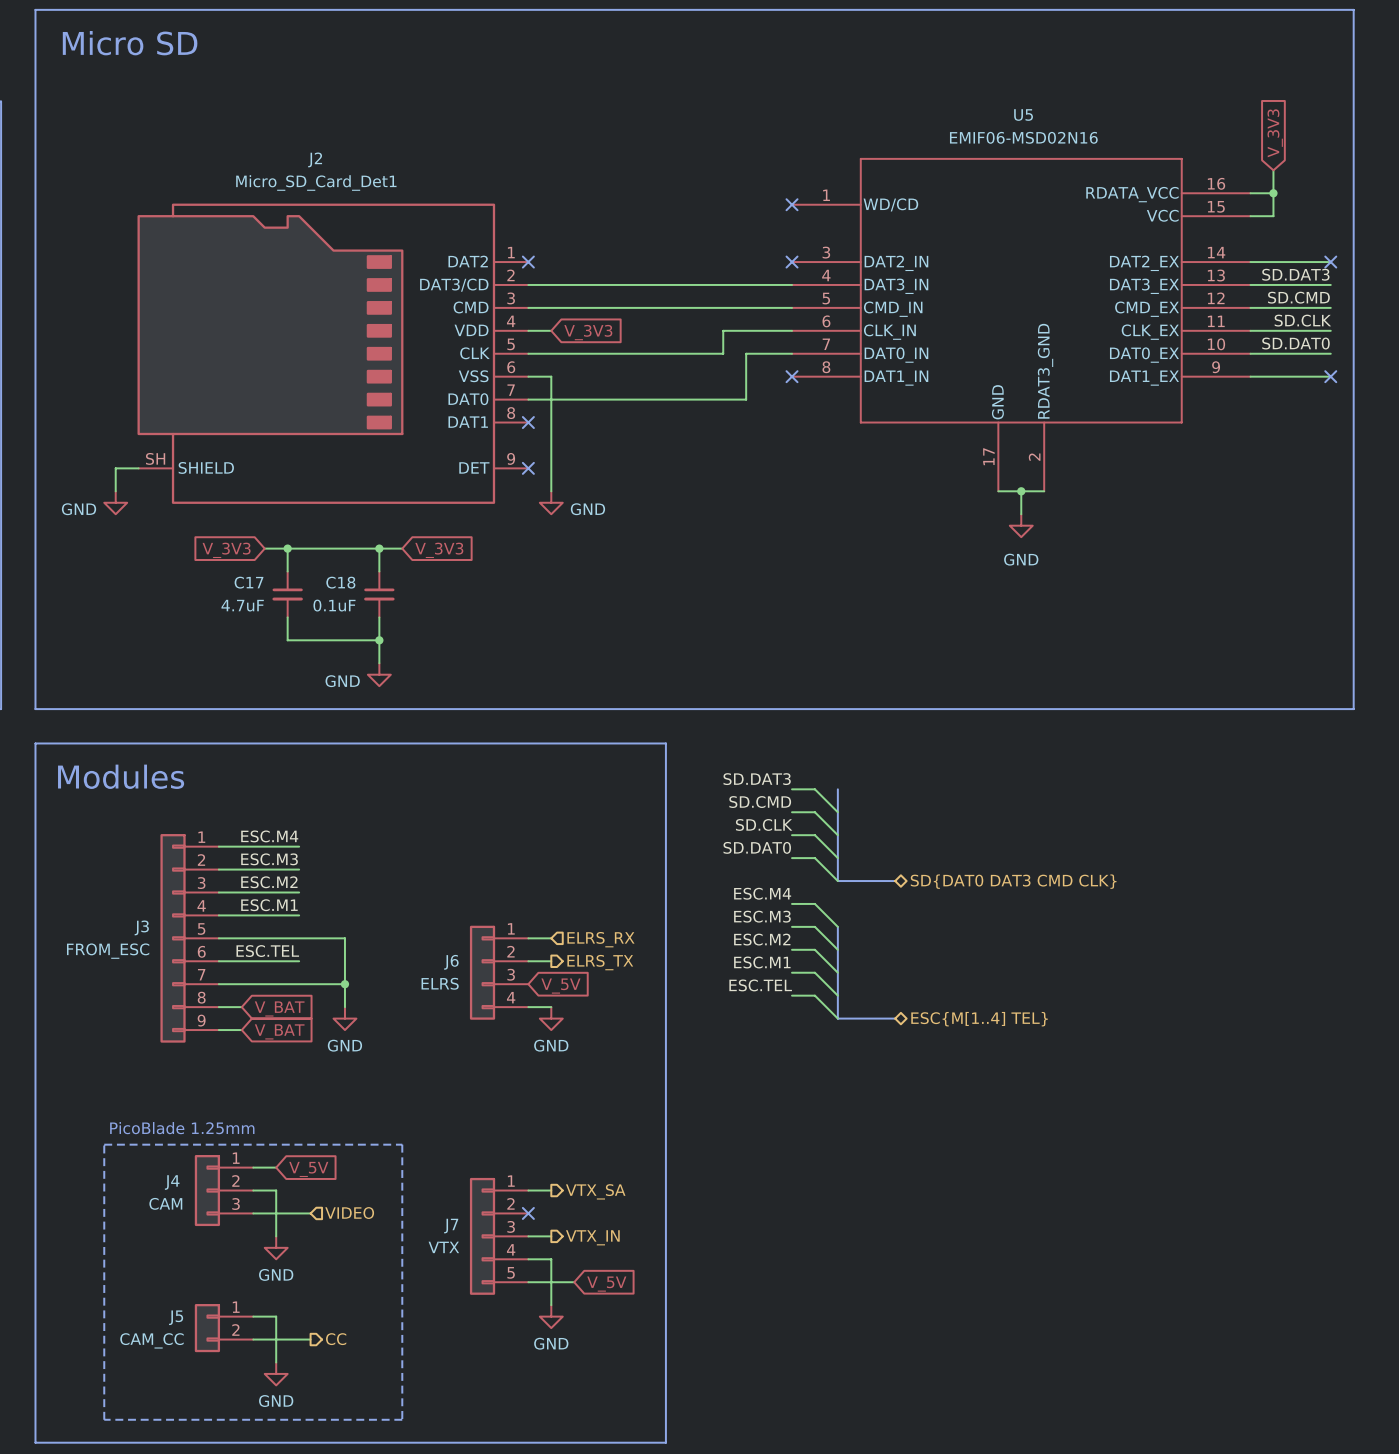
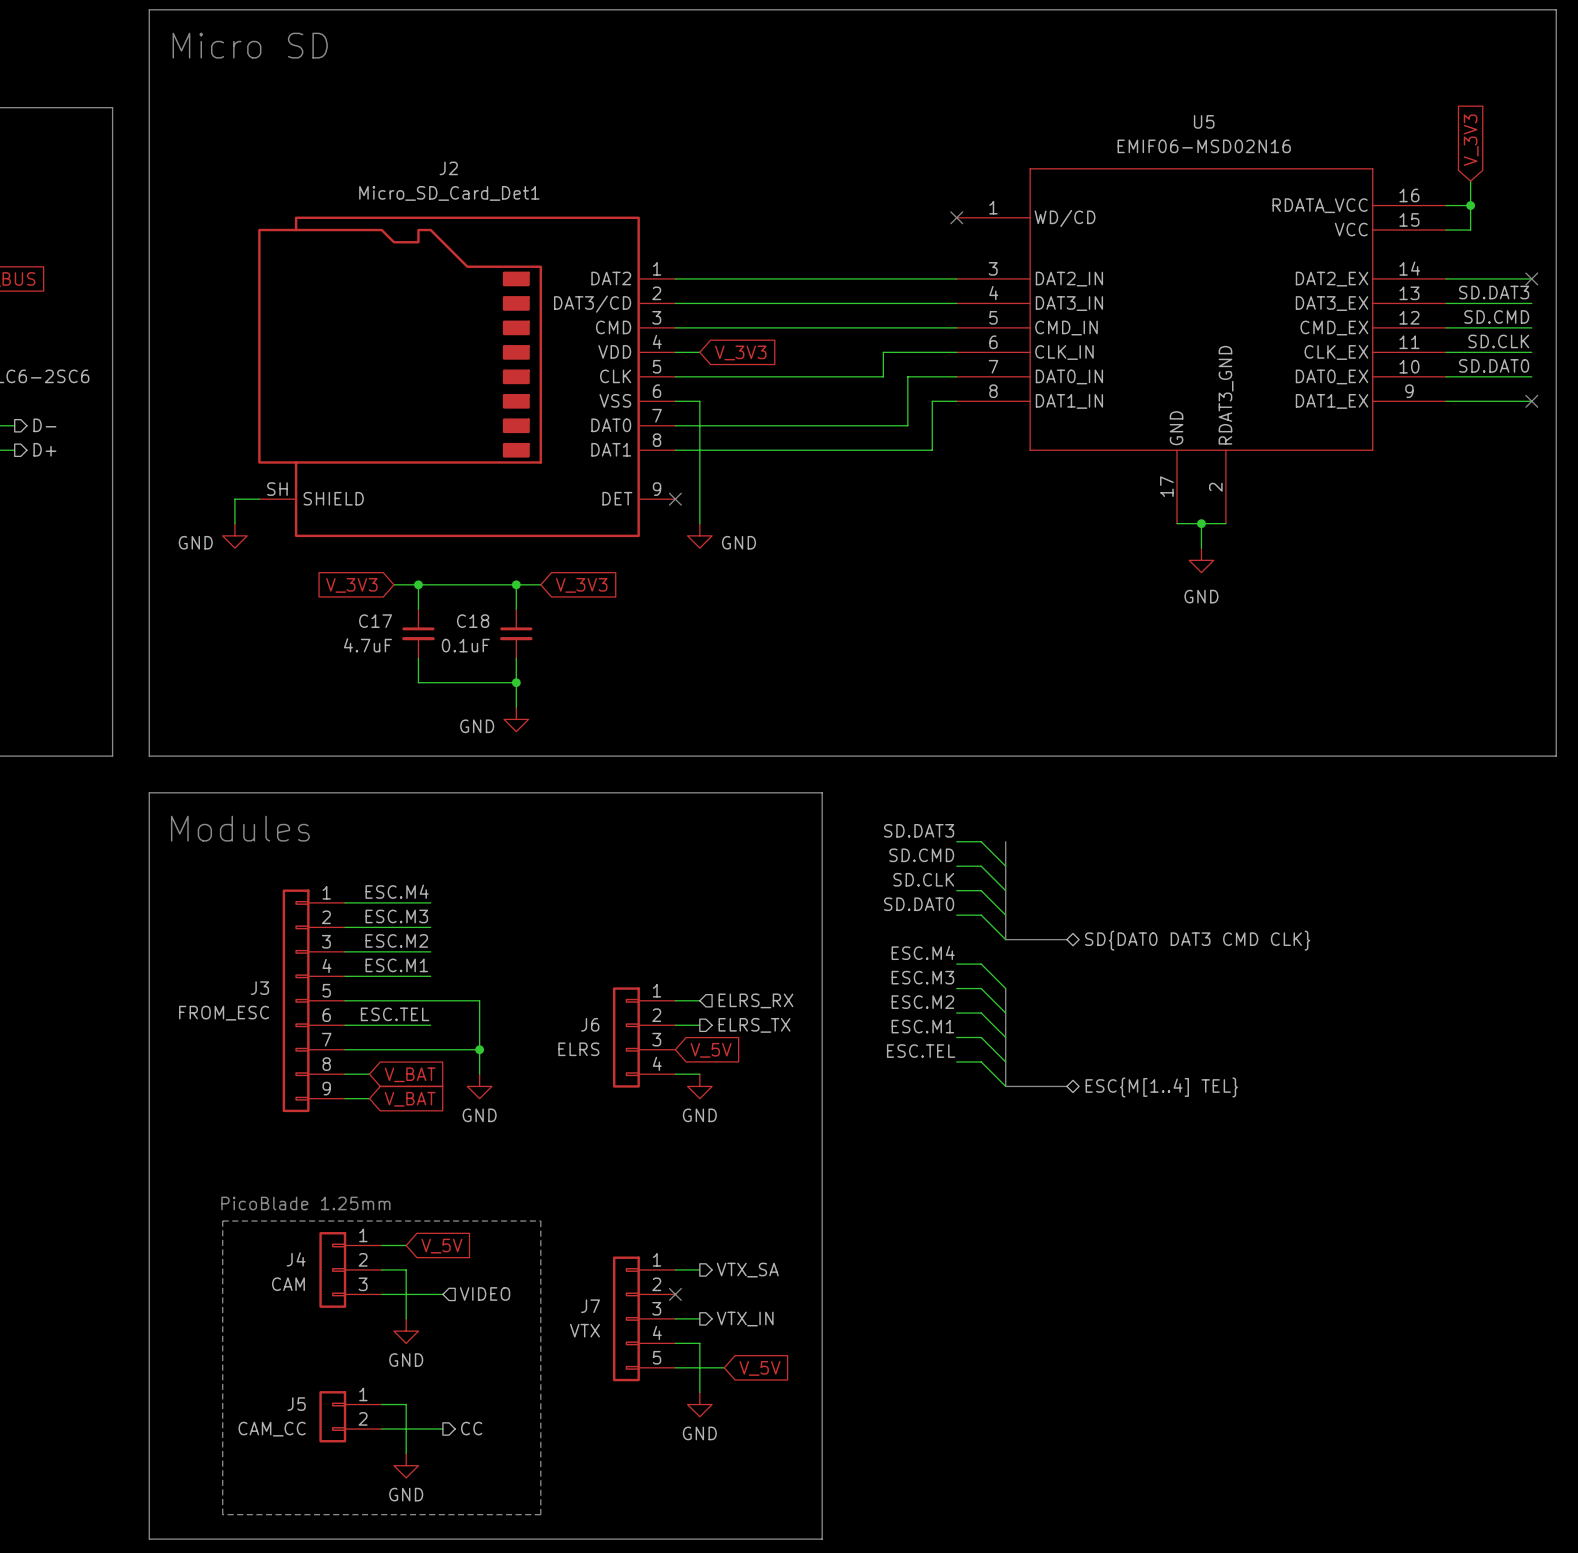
wire: none -> (675, 278) (956, 278)
no-connect mark: (528, 262) -> none
no-connect mark: (792, 262) -> none
wire: none -> (956, 401) (932, 401) (932, 450) (675, 450)
no-connect mark: (792, 376) -> none
no-connect mark: (528, 422) -> none

